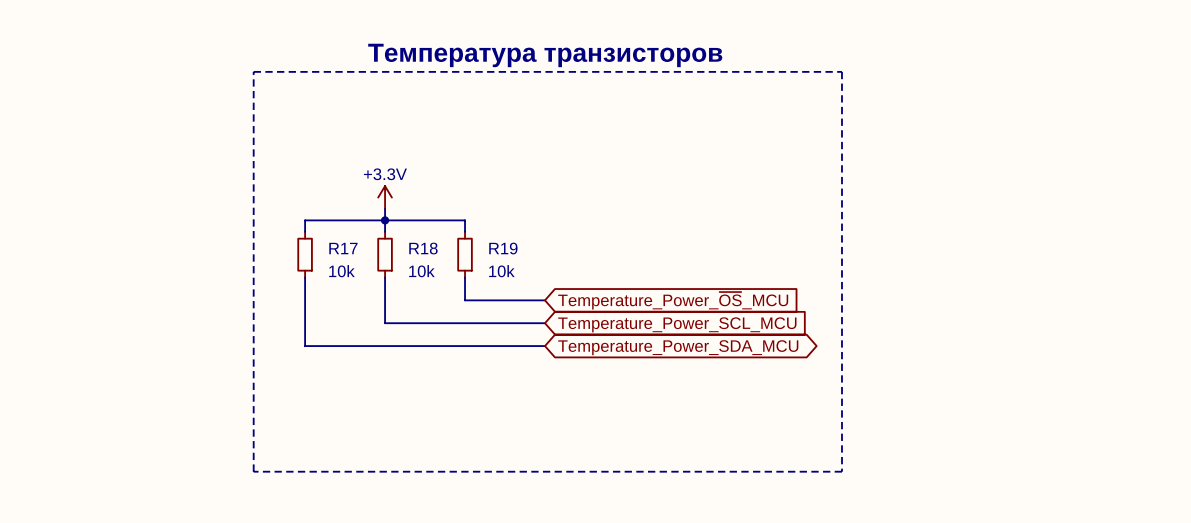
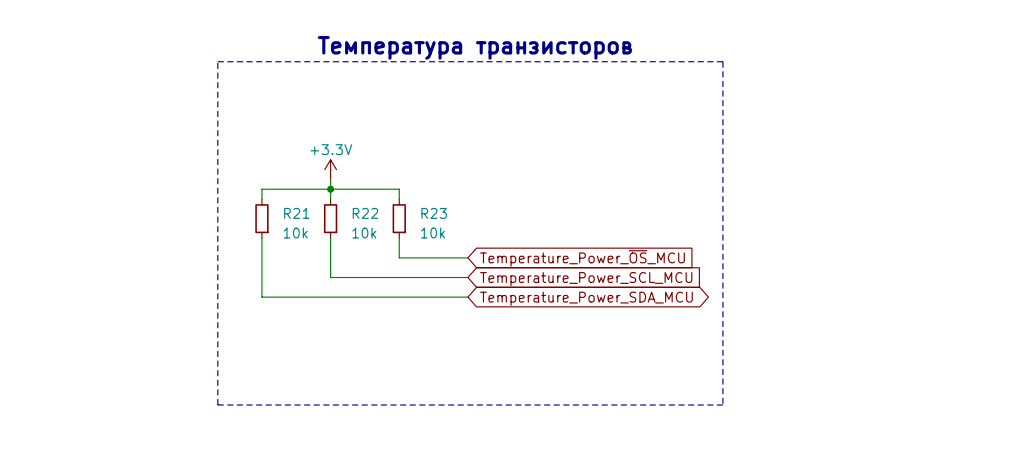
R17 name: R17 (343, 248) -> R21 (296, 213)
R18 name: R18 (423, 248) -> R22 (365, 213)
R19 name: R19 (503, 248) -> R23 (434, 213)

